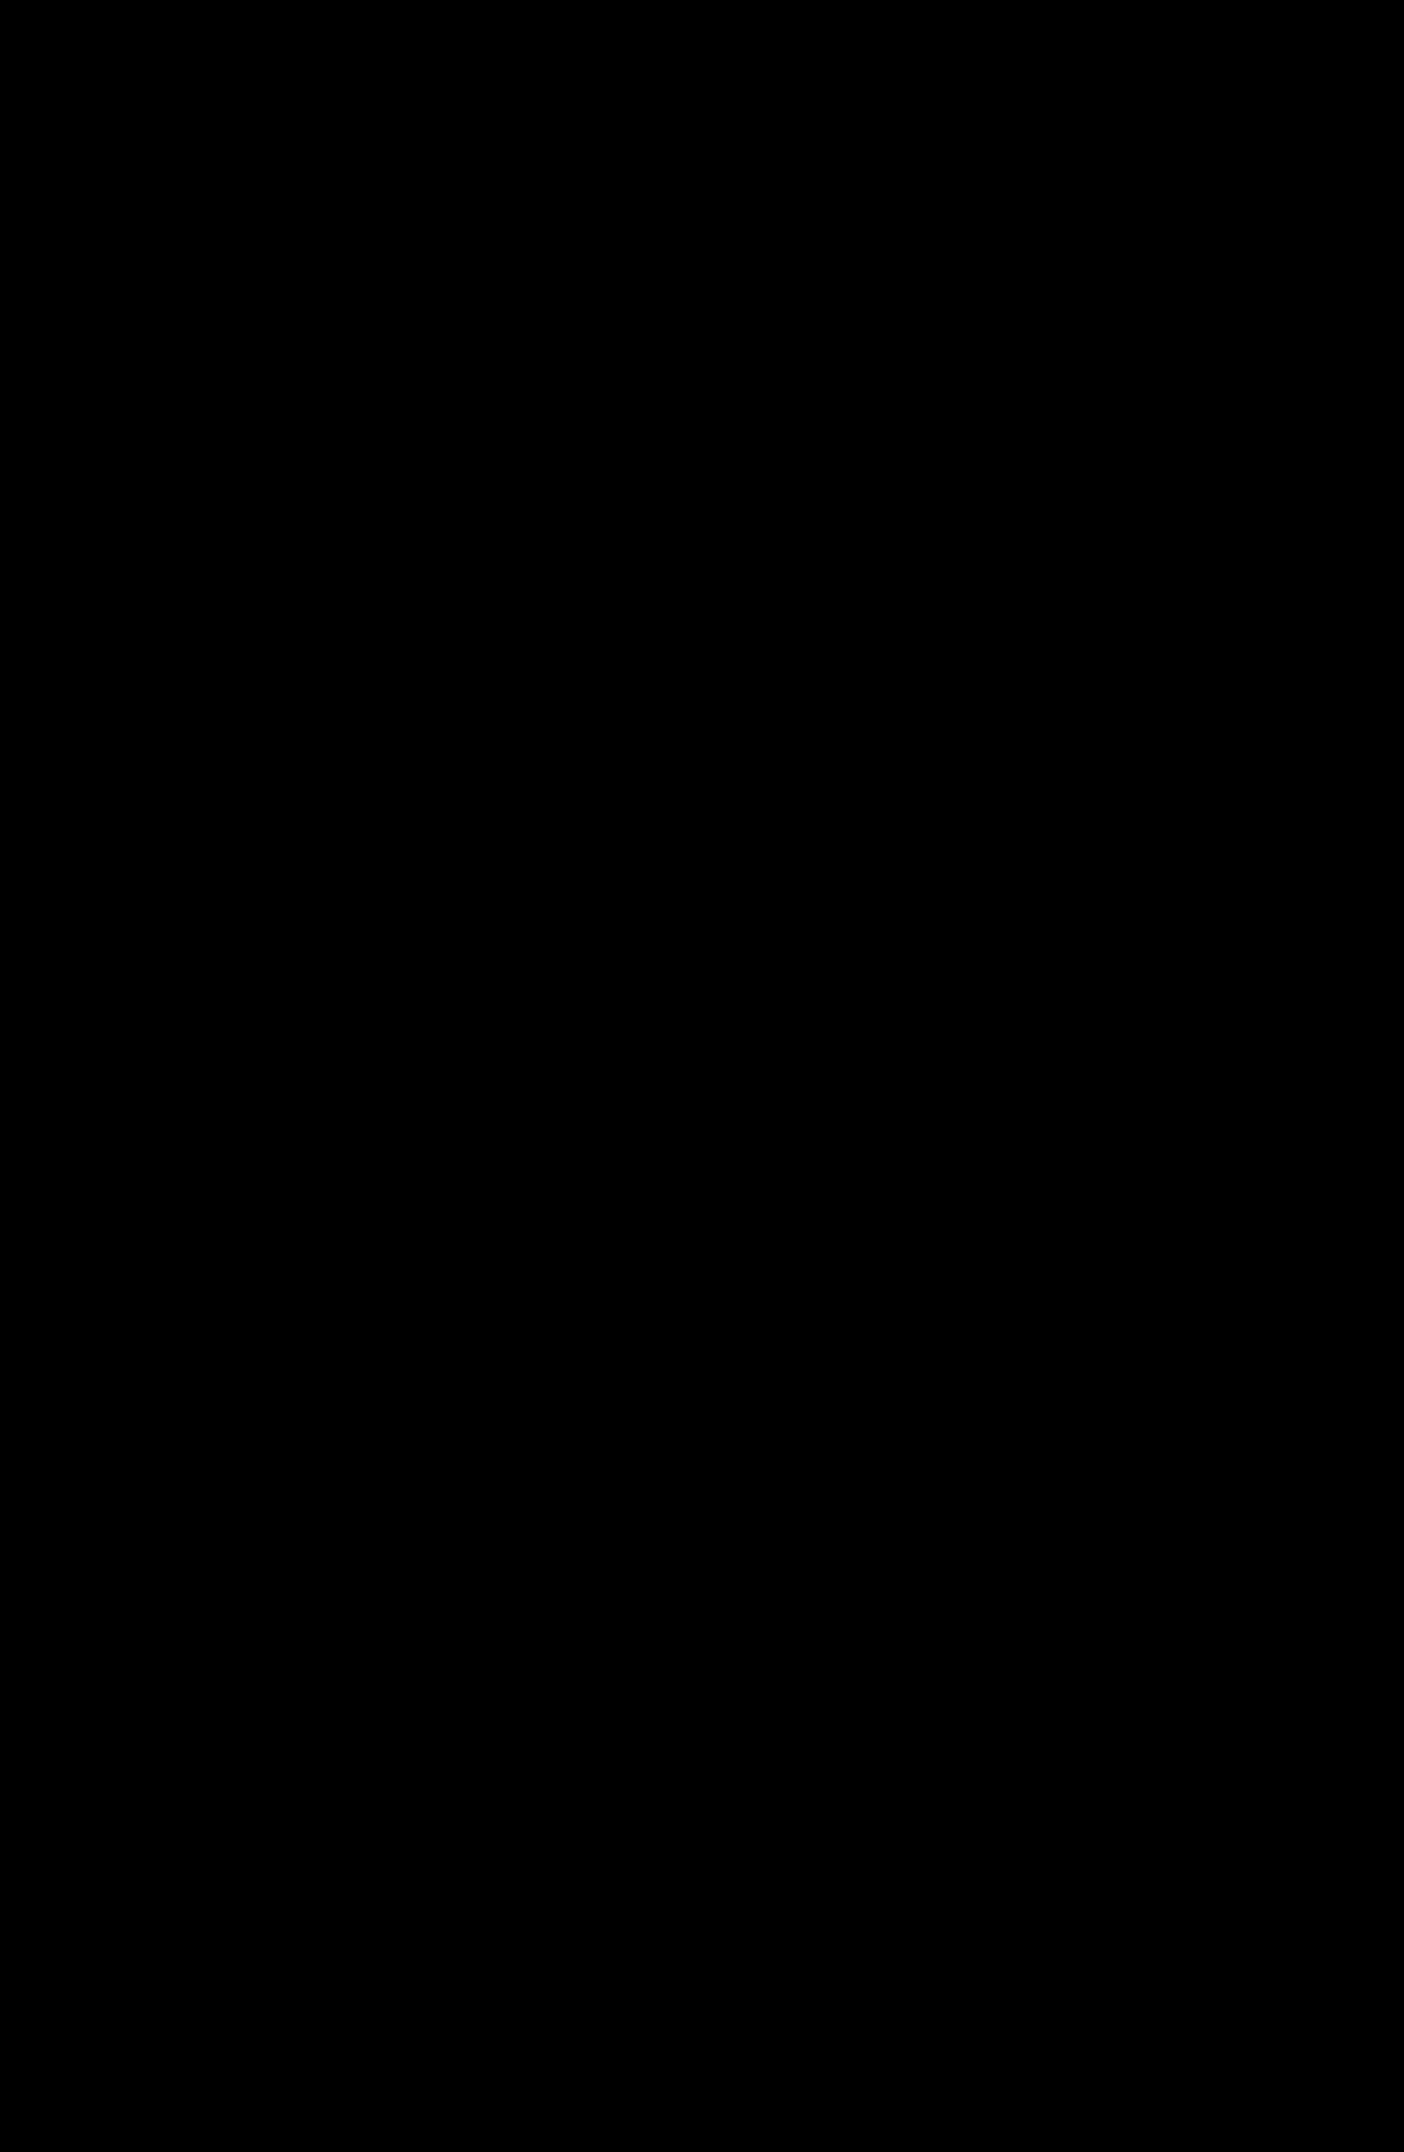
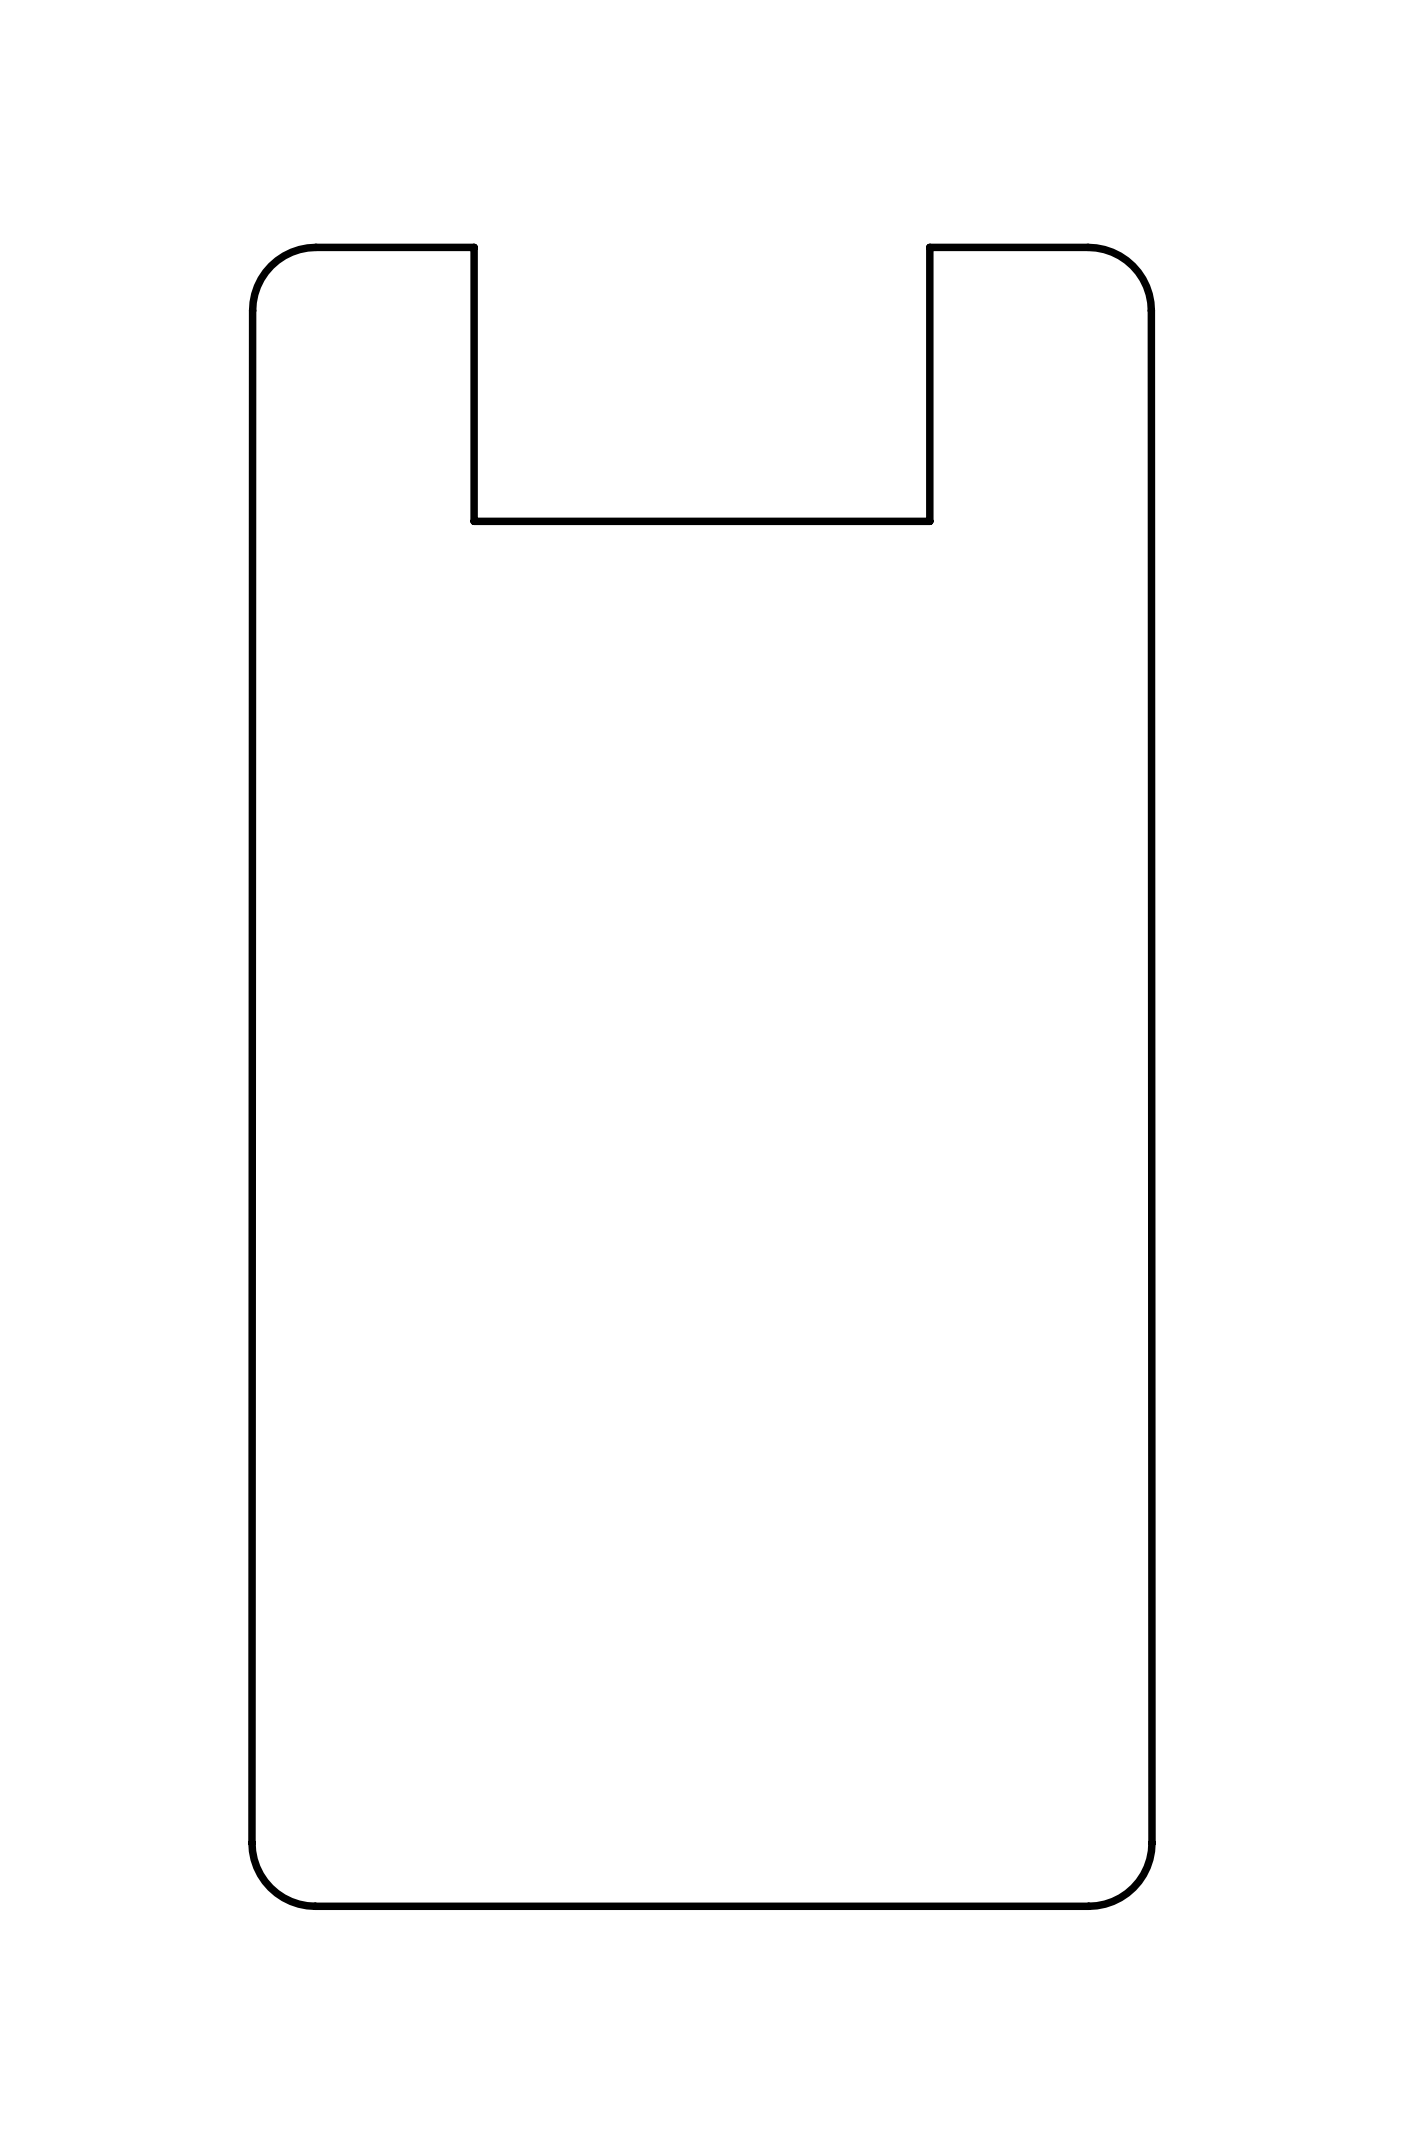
board edge: none -> (315, 247) (474, 247) (474, 521) (929, 521) (929, 247) (1096, 247) (1112, 252) (1126, 260) (1138, 272) (1146, 286) (1151, 310) (1151, 1843) (1149, 1859) (1143, 1874) (1127, 1893) (1112, 1901) (1088, 1906) (315, 1906) (298, 1904) (283, 1897) (265, 1881) (256, 1867) (251, 1843) (252, 310) (257, 286) (271, 265) (291, 252) (315, 247)

